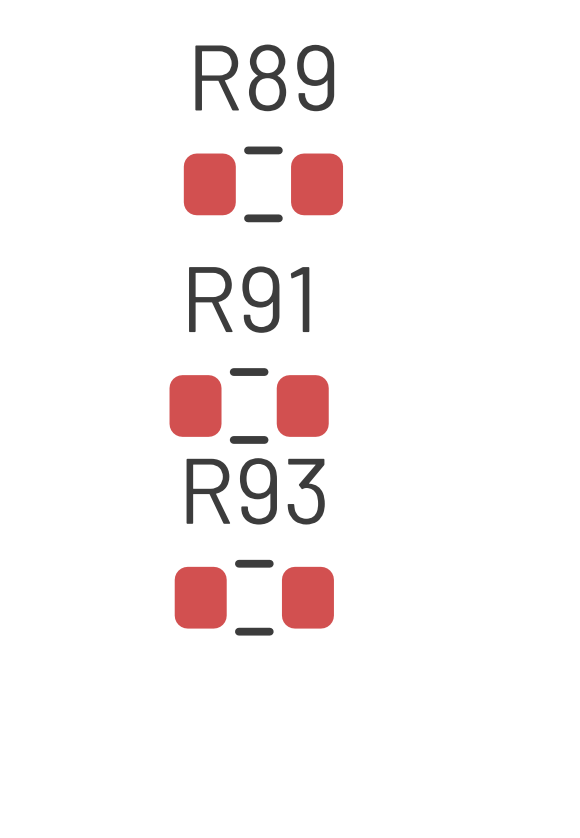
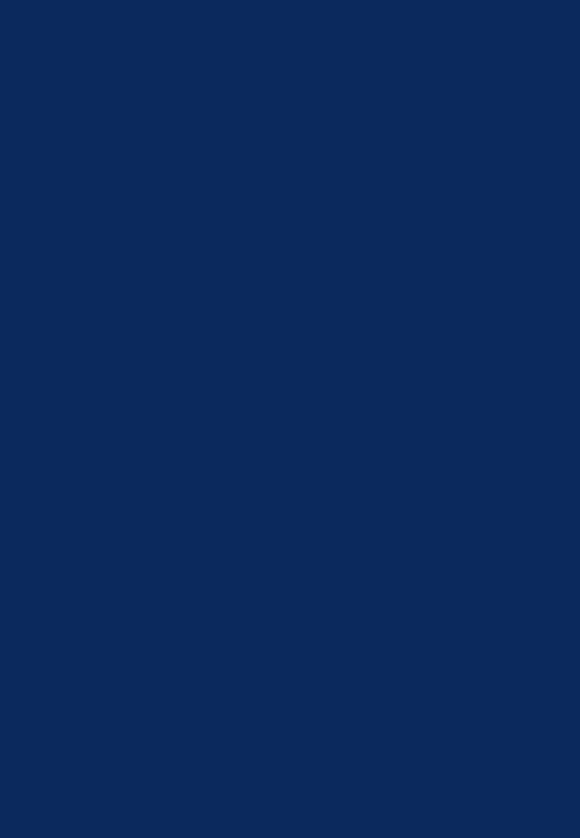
R89: (263, 184) -> none
R91: (249, 406) -> none
R93: (254, 597) -> none

